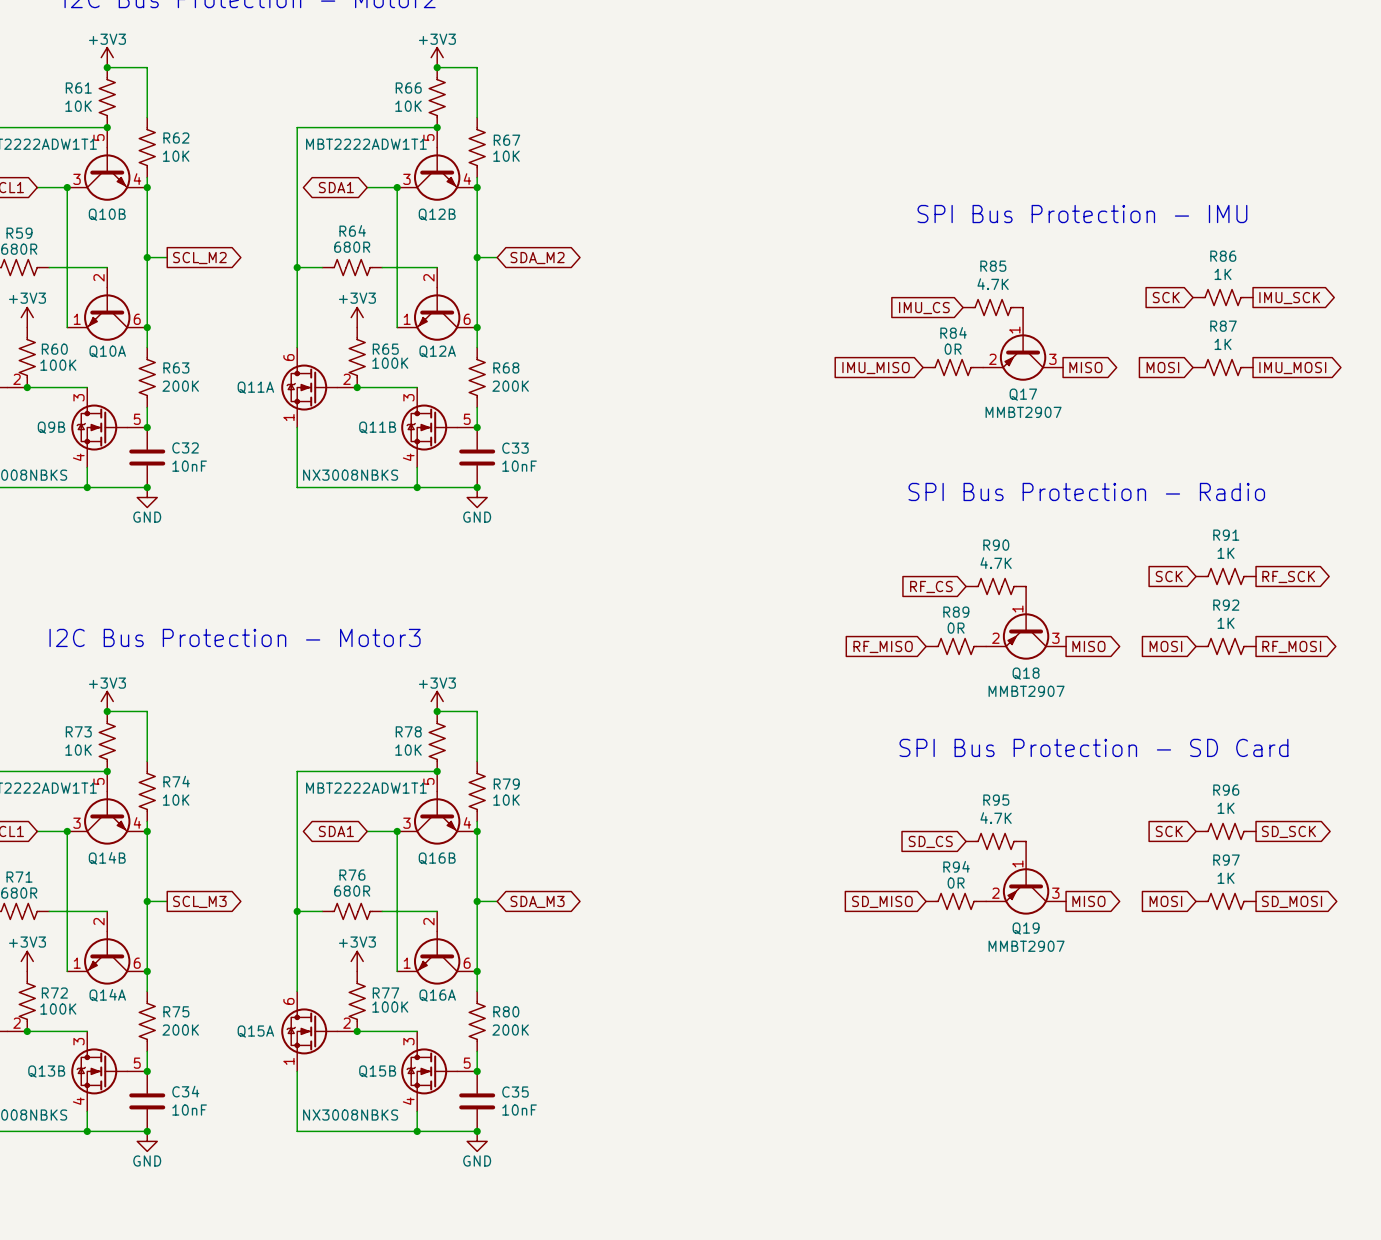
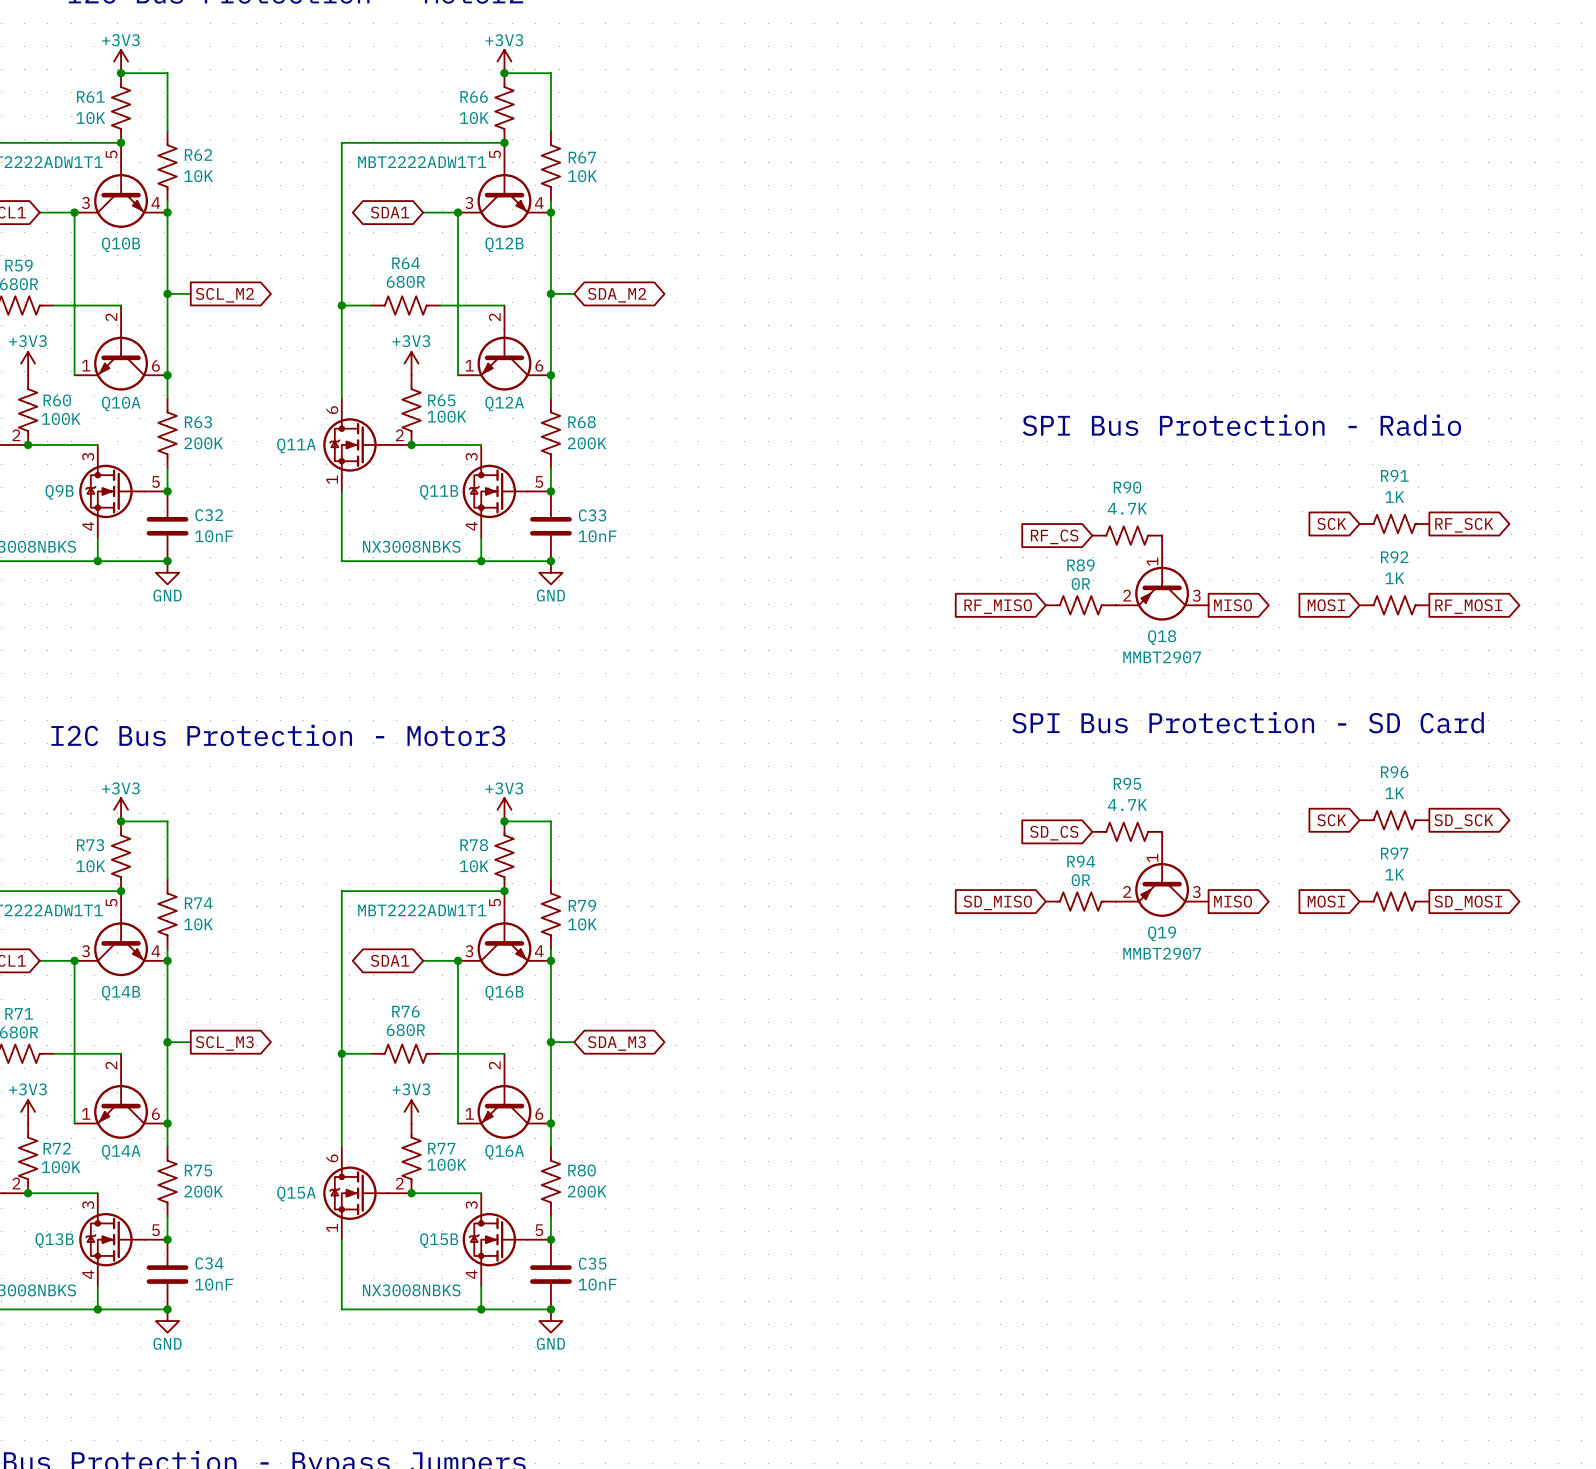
text: SPI Bus Protection - IMU (1082, 214) -> none
global label: SCK (1166, 297) -> none
R86: 1K (1223, 297) -> none
global label: IMU_SCK (1289, 298) -> none
R85: 4.7K (993, 307) -> none
global label: IMU_CS (924, 308) -> none
Q17: MMBT2907 (1023, 344) -> none
R84: 0R (953, 367) -> none
global label: MISO (1085, 367) -> none
global label: MOSI (1162, 367) -> none
R87: 1K (1223, 367) -> none
global label: IMU_MISO (876, 368) -> none
global label: IMU_MOSI (1292, 368) -> none
global label: none -> SCK (1331, 523)
text position: SPI Bus Protection - Radio (1086, 491) -> SPI Bus Protection - Radio (1241, 425)
global label: none -> MISO (1233, 605)
global label: none -> MOSI (1326, 605)
global label: SCK (1169, 576) -> none
R91 position: (1226, 576) -> (1394, 523)
global label position: RF_SCK (1288, 576) -> RF_SCK (1464, 525)
global label position: RF_CS (931, 586) -> RF_CS (1054, 536)
R90 position: (996, 586) -> (1127, 535)
Q18 position: (1026, 623) -> (1162, 578)
global label position: RF_MISO (883, 646) -> RF_MISO (998, 606)
R89 position: (956, 646) -> (1080, 605)
global label: MISO (1088, 646) -> none
global label: MOSI (1165, 646) -> none
R92 position: (1226, 646) -> (1394, 605)
global label position: RF_MOSI (1291, 646) -> RF_MOSI (1468, 606)
global label: none -> SCK (1331, 820)
text position: SPI Bus Protection - SD Card (1093, 747) -> SPI Bus Protection - SD Card (1248, 722)
global label: none -> MISO (1233, 901)
global label: none -> MOSI (1326, 901)
global label: SCK (1169, 831) -> none
R96 position: (1226, 831) -> (1394, 820)
global label position: SD_SCK (1288, 831) -> SD_SCK (1463, 821)
global label position: SD_CS (930, 841) -> SD_CS (1054, 833)
R95 position: (996, 841) -> (1127, 831)
Q19 position: (1026, 878) -> (1162, 874)
global label position: SD_MISO (882, 901) -> SD_MISO (997, 902)
R94 position: (956, 901) -> (1080, 901)
global label: MISO (1088, 901) -> none
global label: MOSI (1165, 901) -> none
R97 position: (1226, 901) -> (1394, 901)
global label position: SD_MOSI (1291, 901) -> SD_MOSI (1468, 902)

